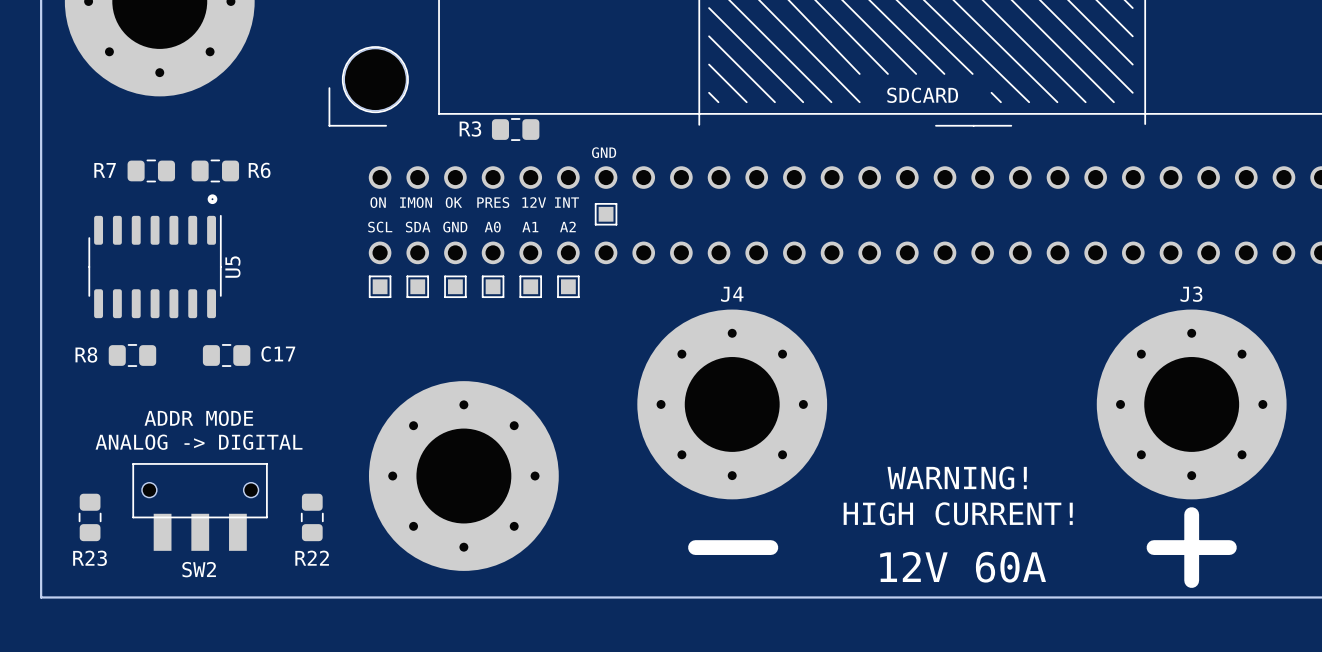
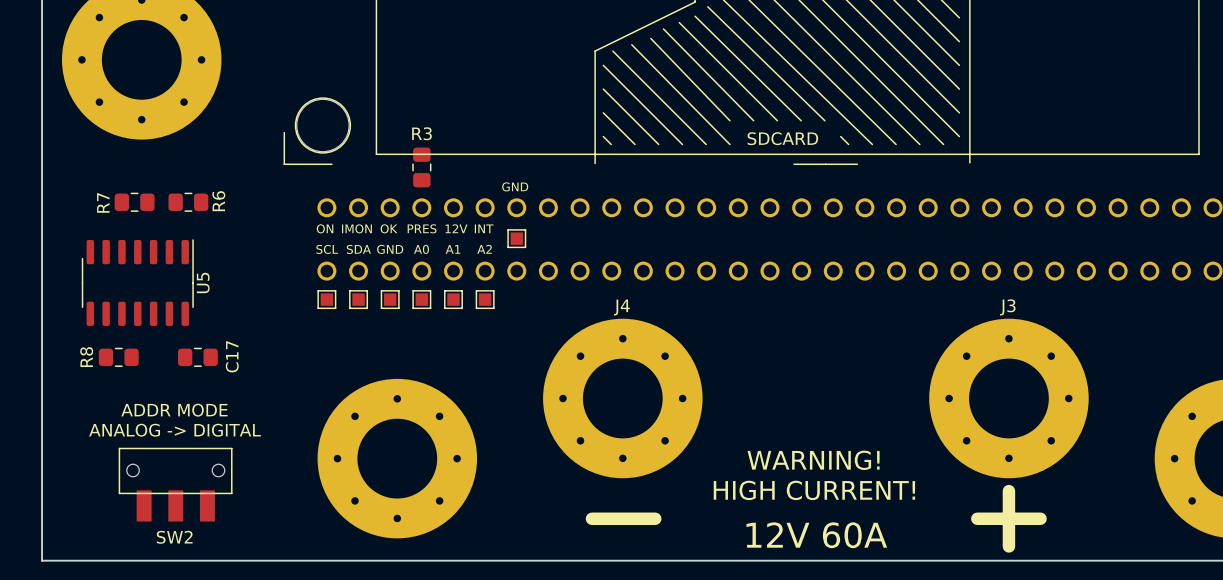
R3 rotation: 0° (515, 129) -> 90° clockwise (421, 167)
R7 name rotation: 0° (105, 170) -> 90° counterclockwise (103, 202)
R6 name rotation: 0° (259, 170) -> 90° counterclockwise (218, 201)
drawing: [207, 194, 218, 205] -> none
R8 name rotation: 0° (86, 354) -> 90° counterclockwise (86, 357)
C17 name rotation: 0° (278, 354) -> 90° counterclockwise (232, 356)
R23: (90, 517) -> none
R22: (312, 517) -> none

